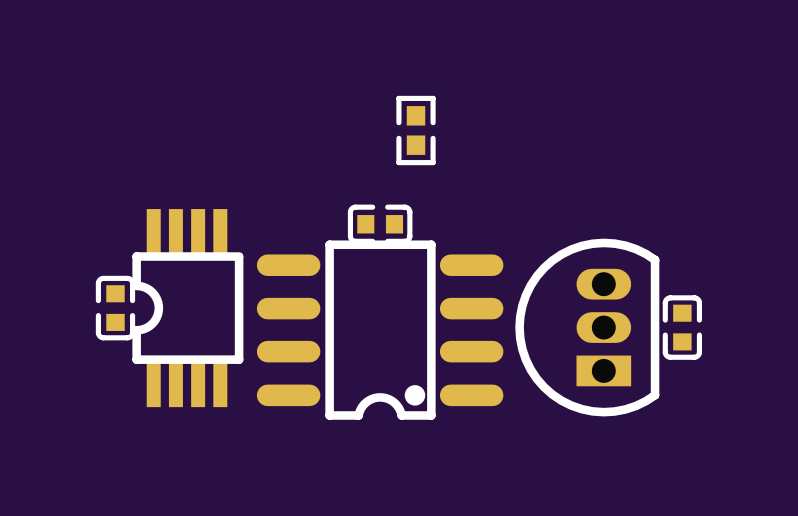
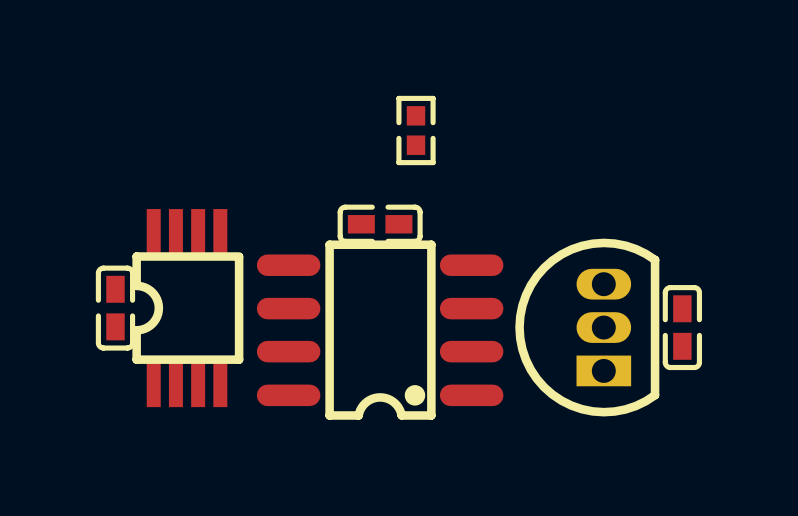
part footprint: [347, 204, 413, 244] -> [337, 204, 423, 244]
part footprint: [95, 275, 136, 341] -> [95, 265, 136, 351]
part footprint: [662, 295, 703, 360] -> [662, 285, 703, 371]

